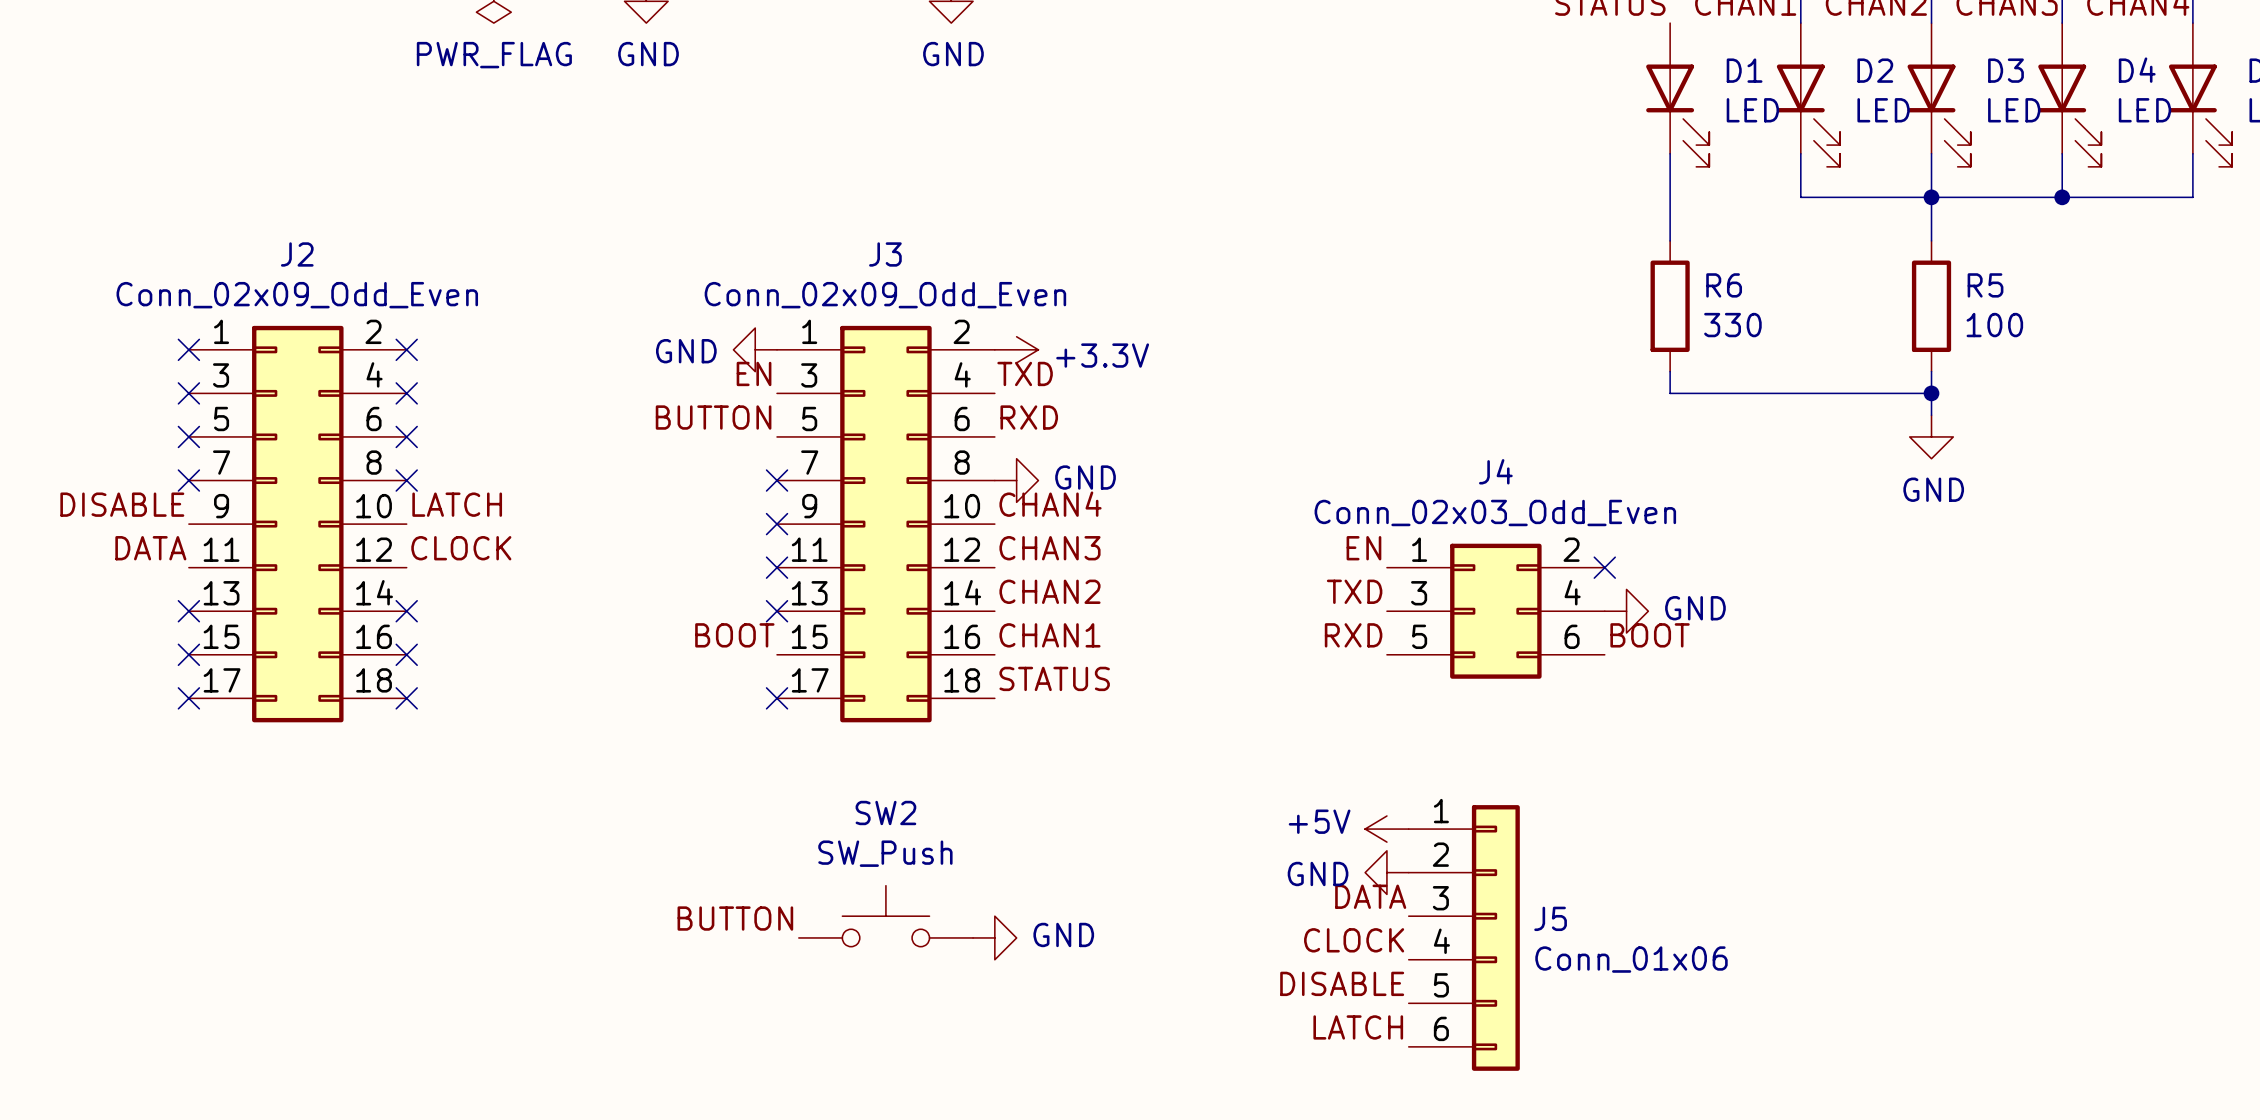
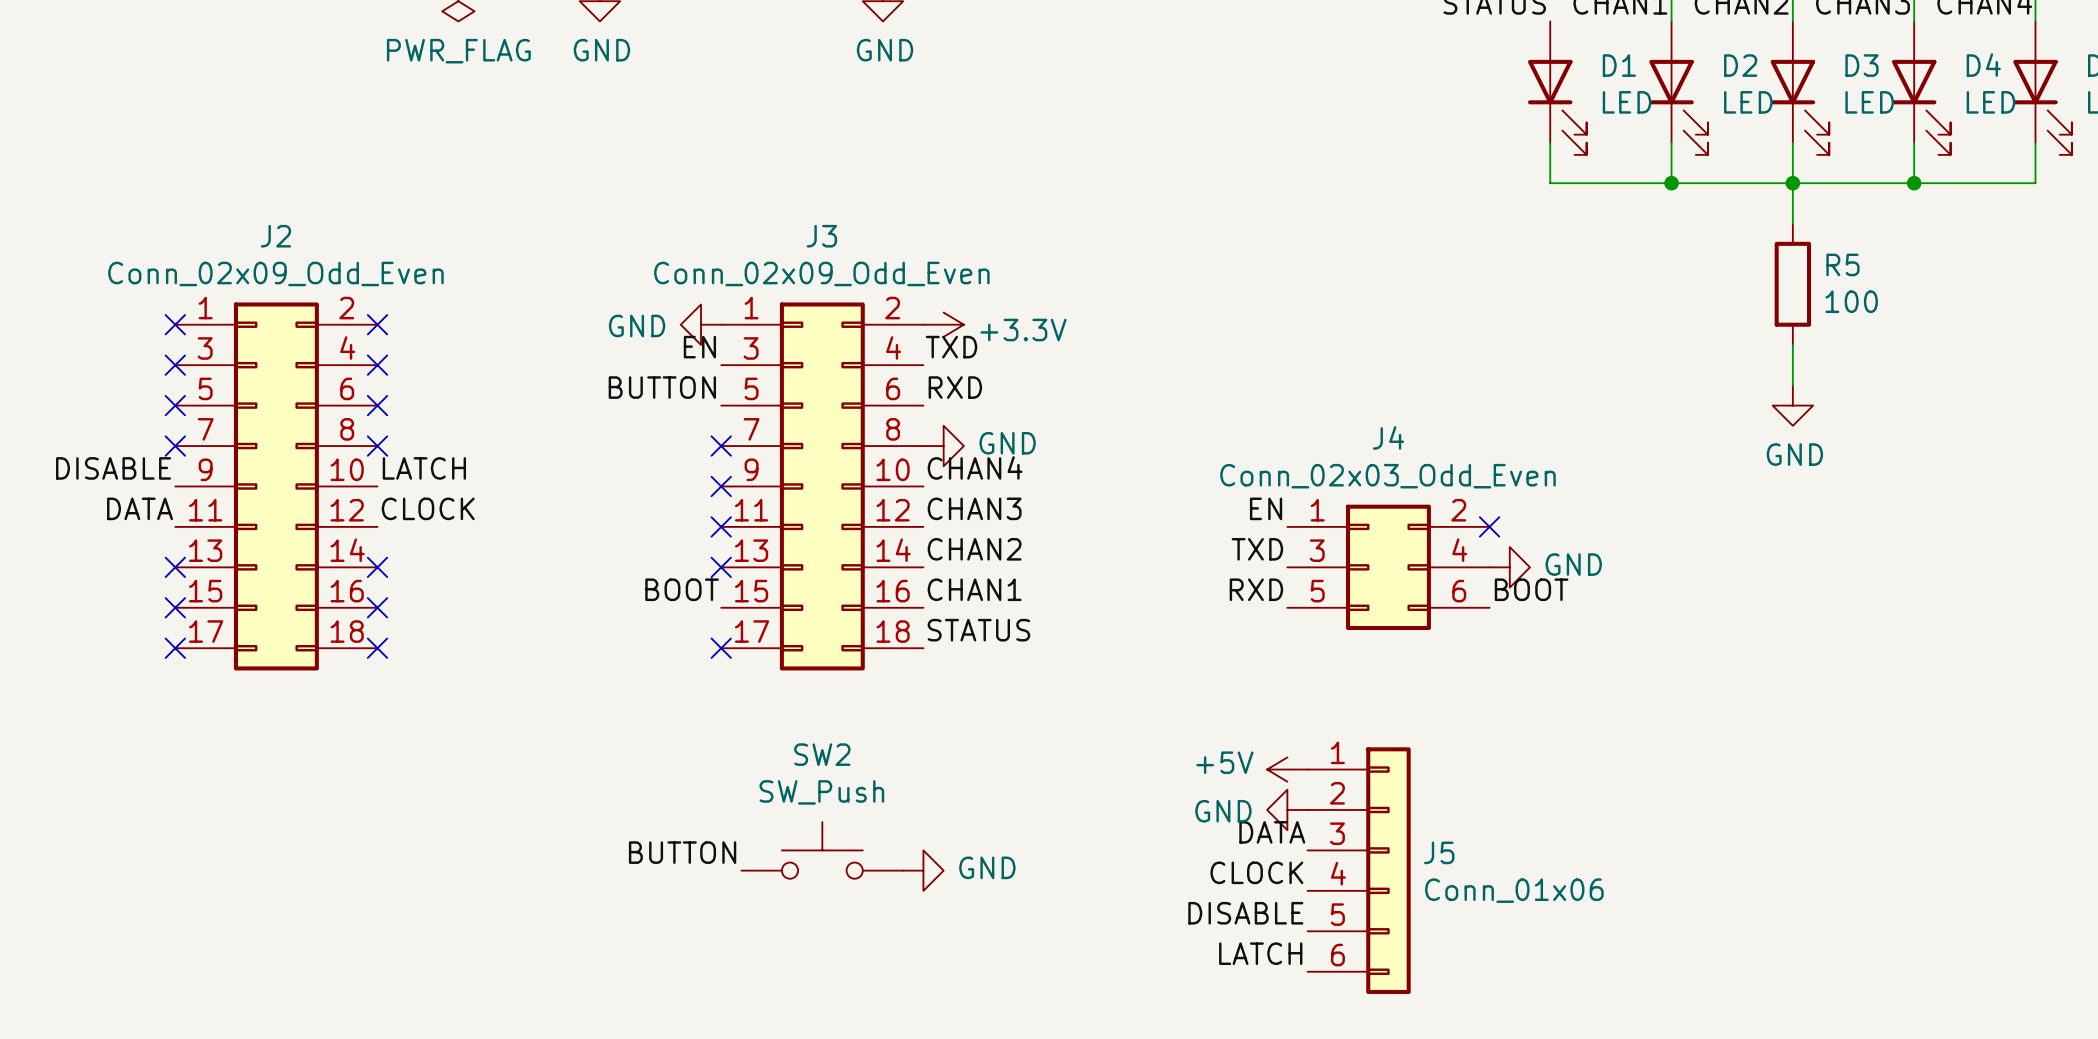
wire: (1670, 197) (1670, 240) -> (1550, 183) (1671, 183)
junction: none -> (1671, 183)
R6: 330 (1670, 306) -> none
wire: (1670, 371) (1670, 393) (1931, 393) -> none
junction: (1931, 393) -> none

